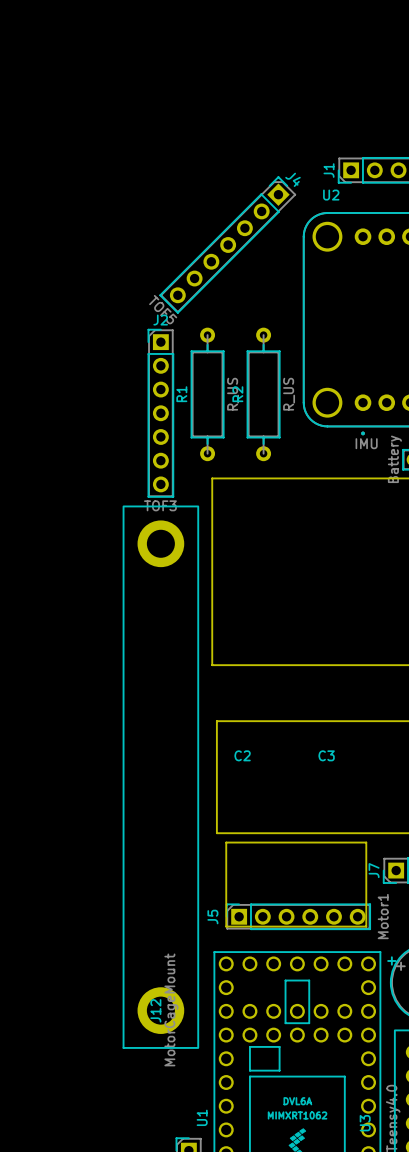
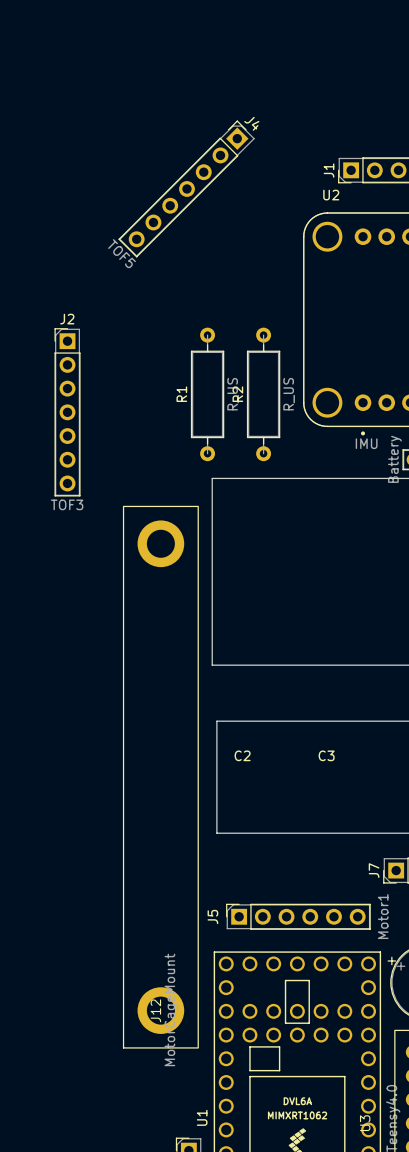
J4 position: (227, 244) -> (186, 188)
J2 position: (160, 413) -> (67, 412)
board edge: (226, 842) (366, 842) (366, 926) (226, 926) (226, 842) -> none

